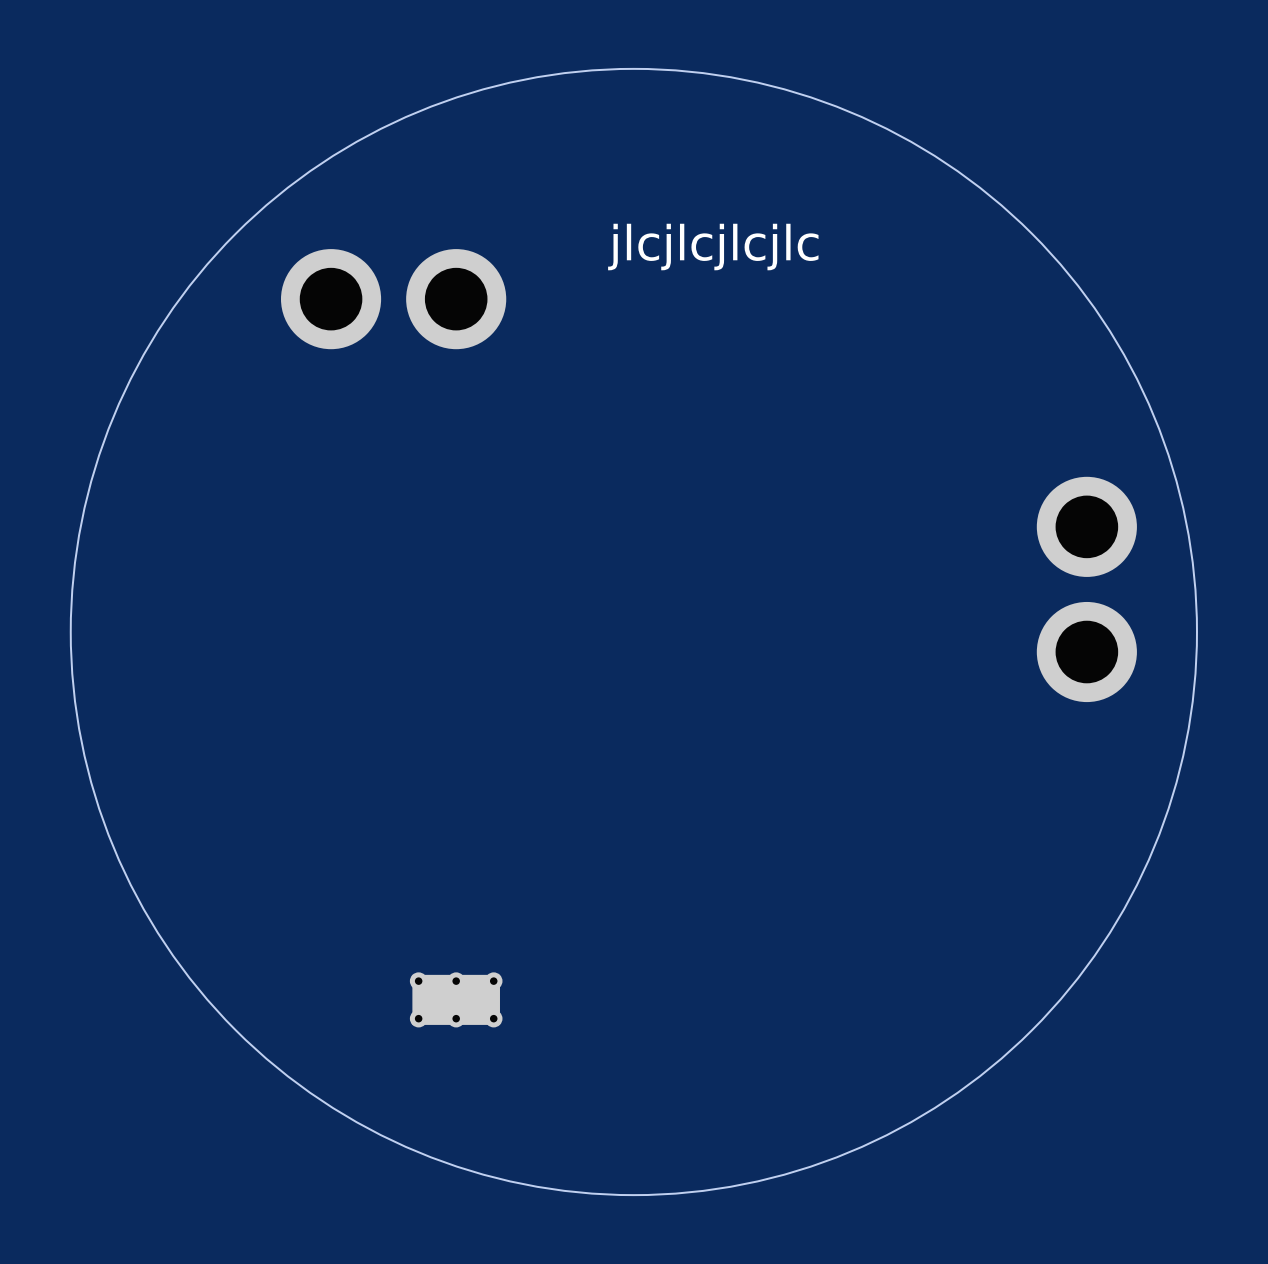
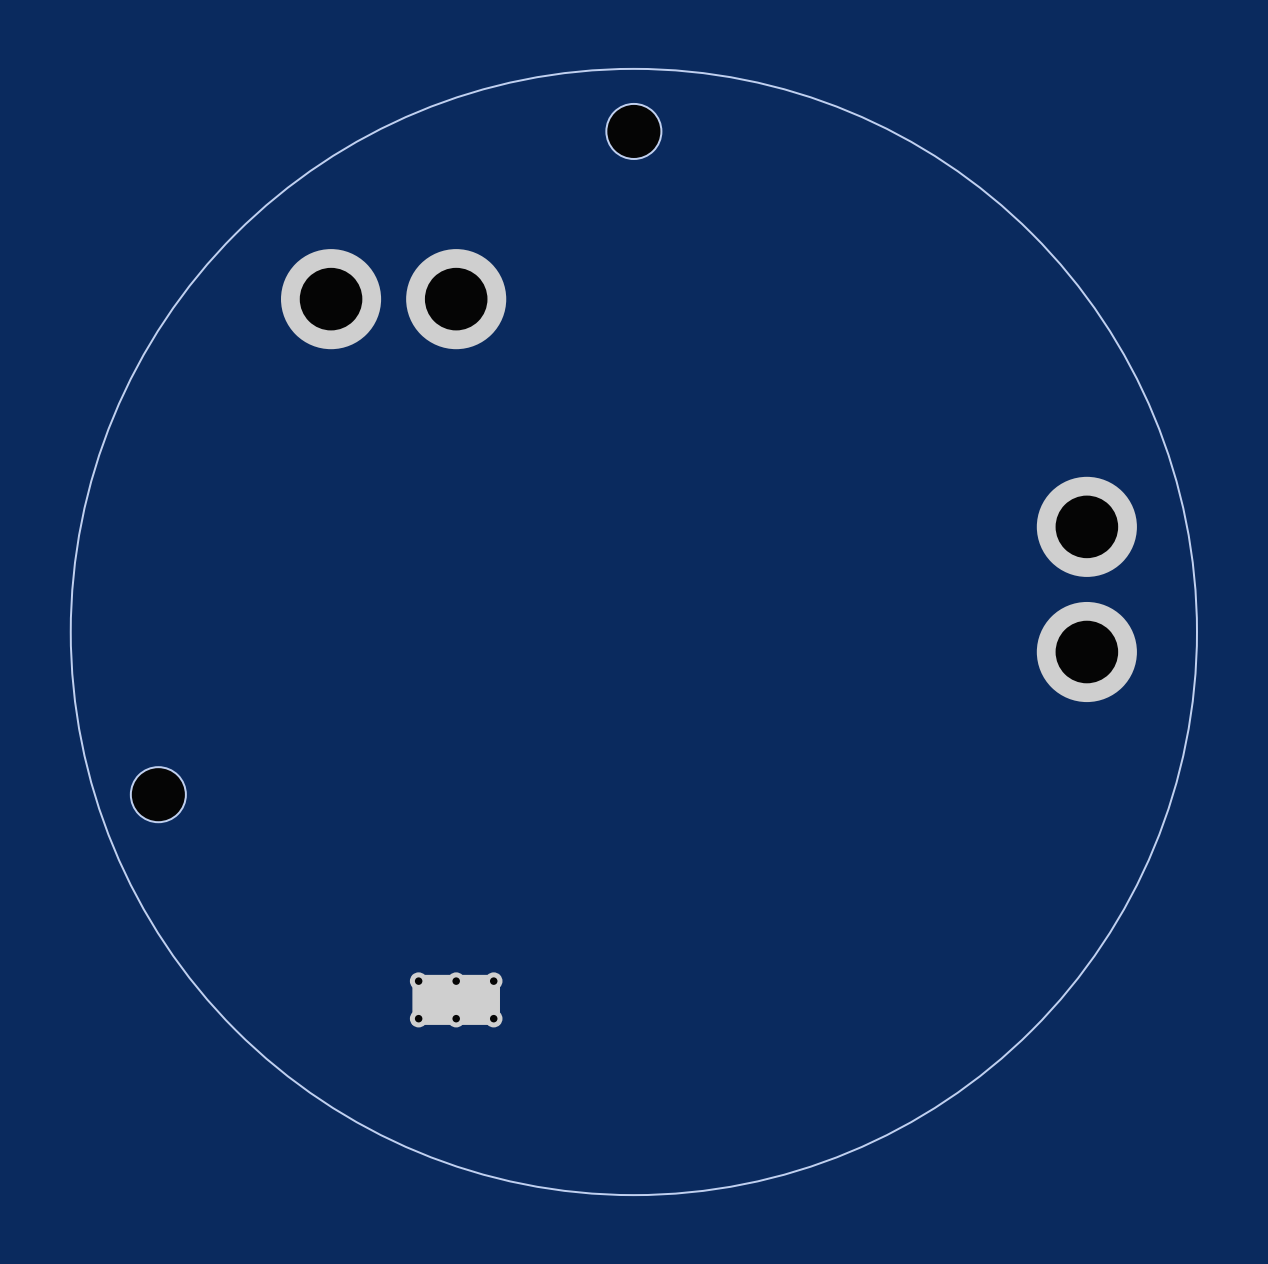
part: none -> (633, 131)
text: jlcjlcjlcjlc (713, 247) -> none
part: none -> (158, 794)

